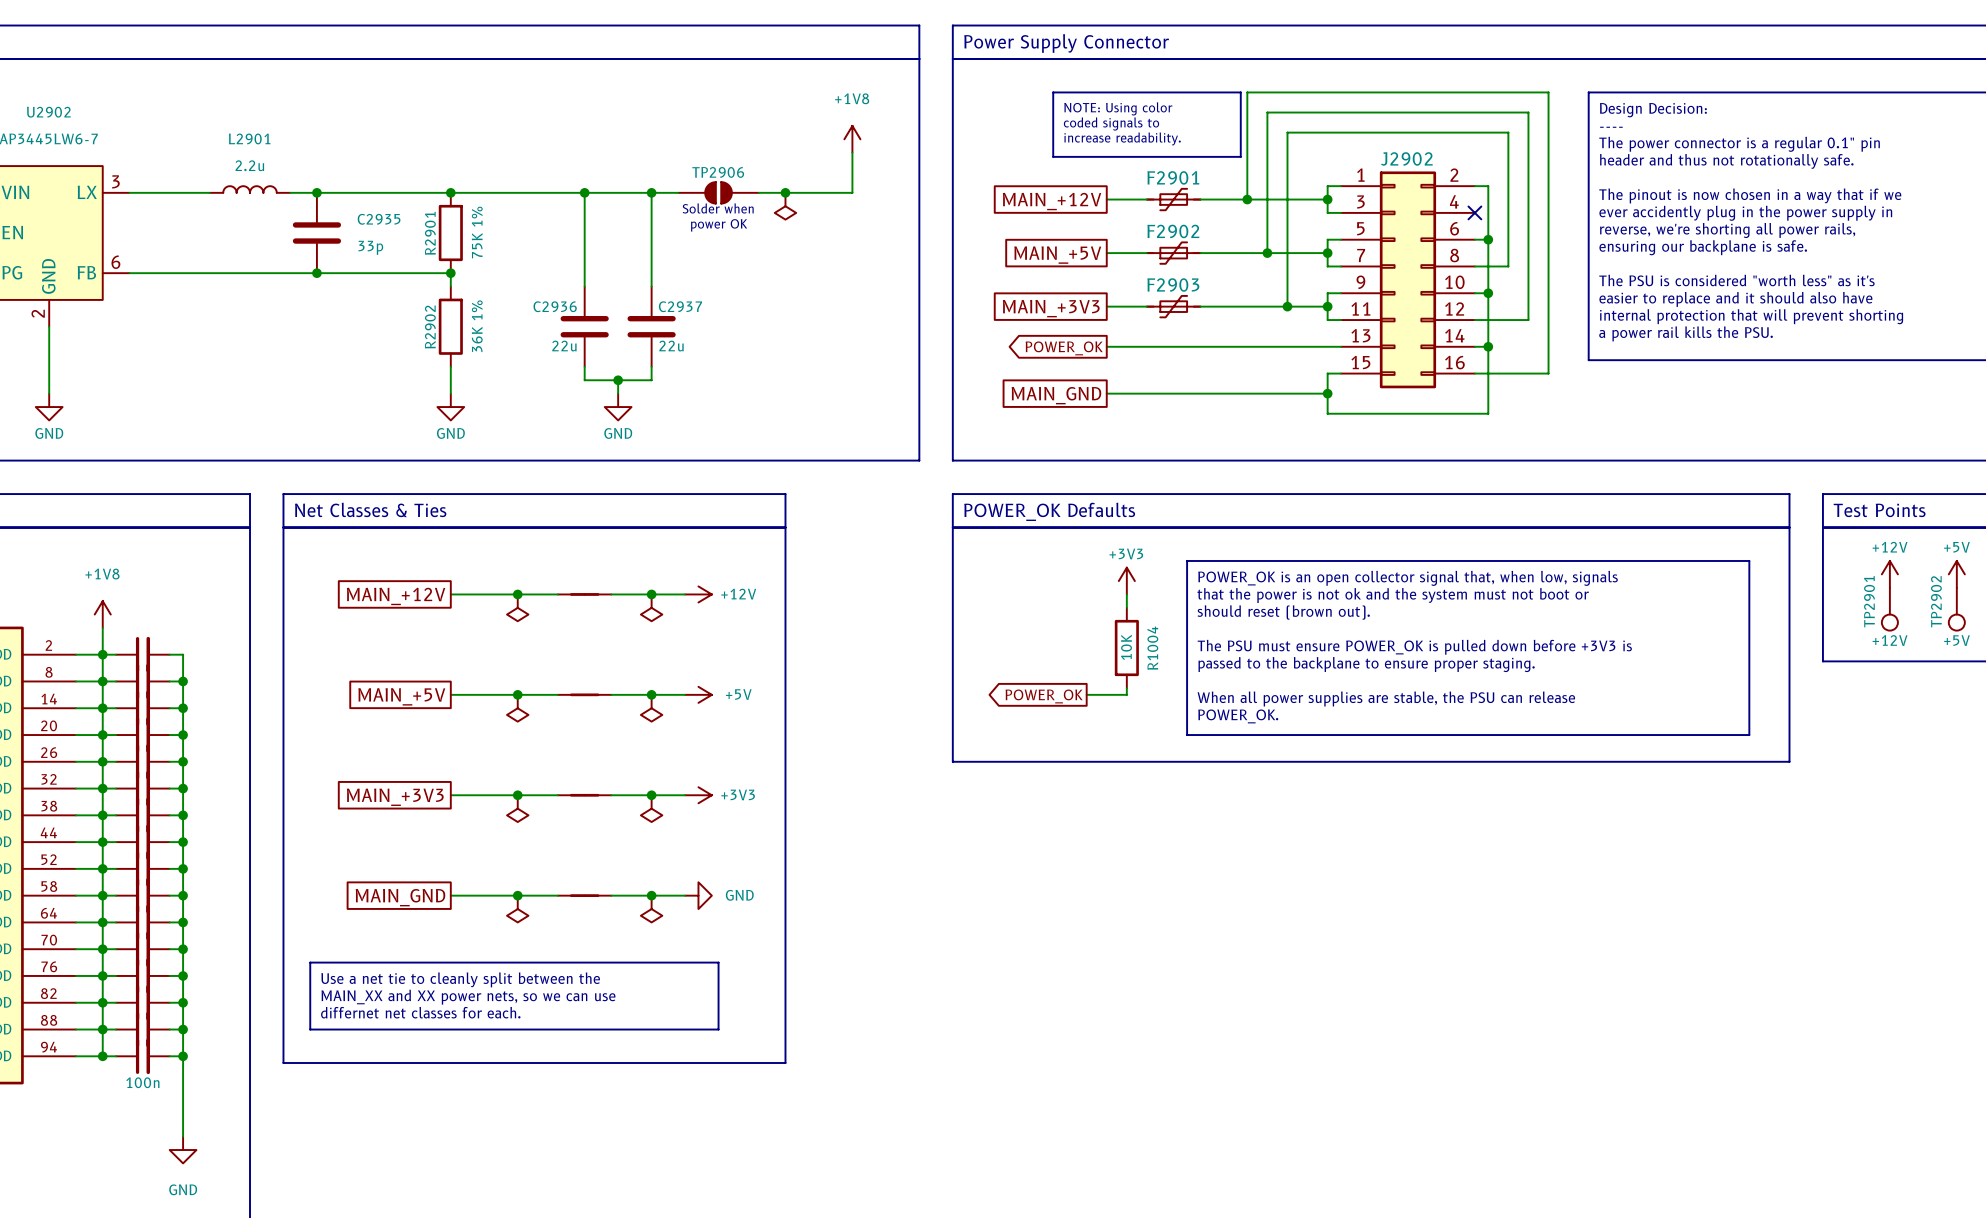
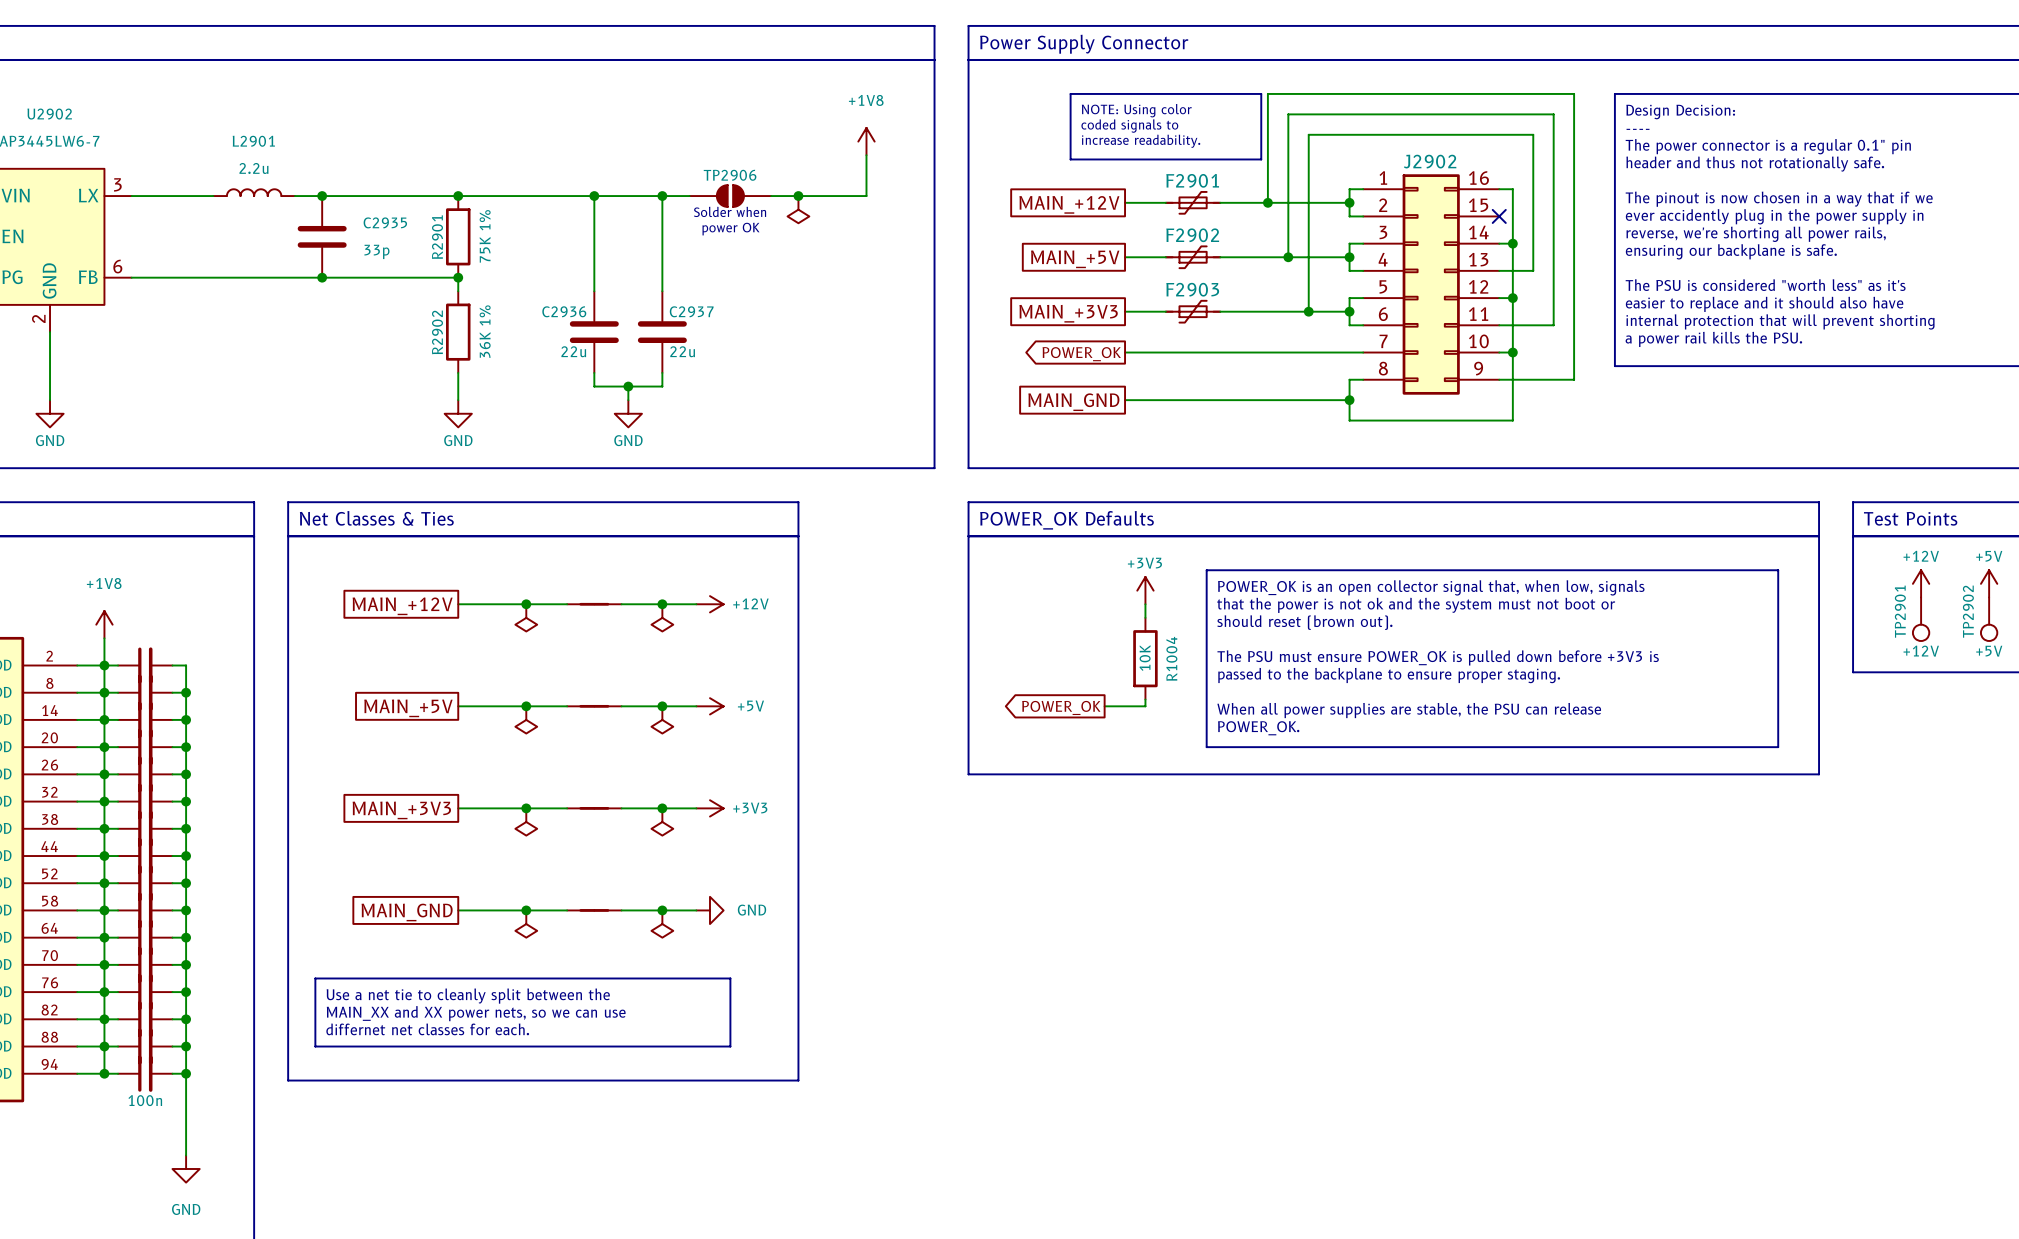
J2902 symbol: [1341, 171, 1475, 389] -> [1363, 174, 1500, 395]

